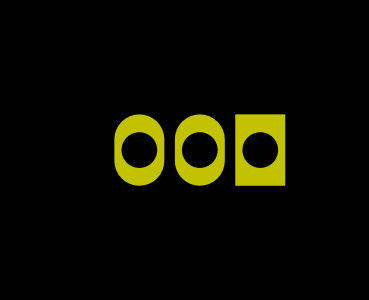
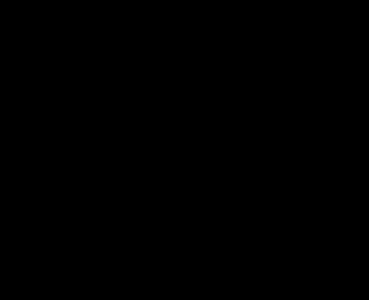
part: (199, 150) -> none

